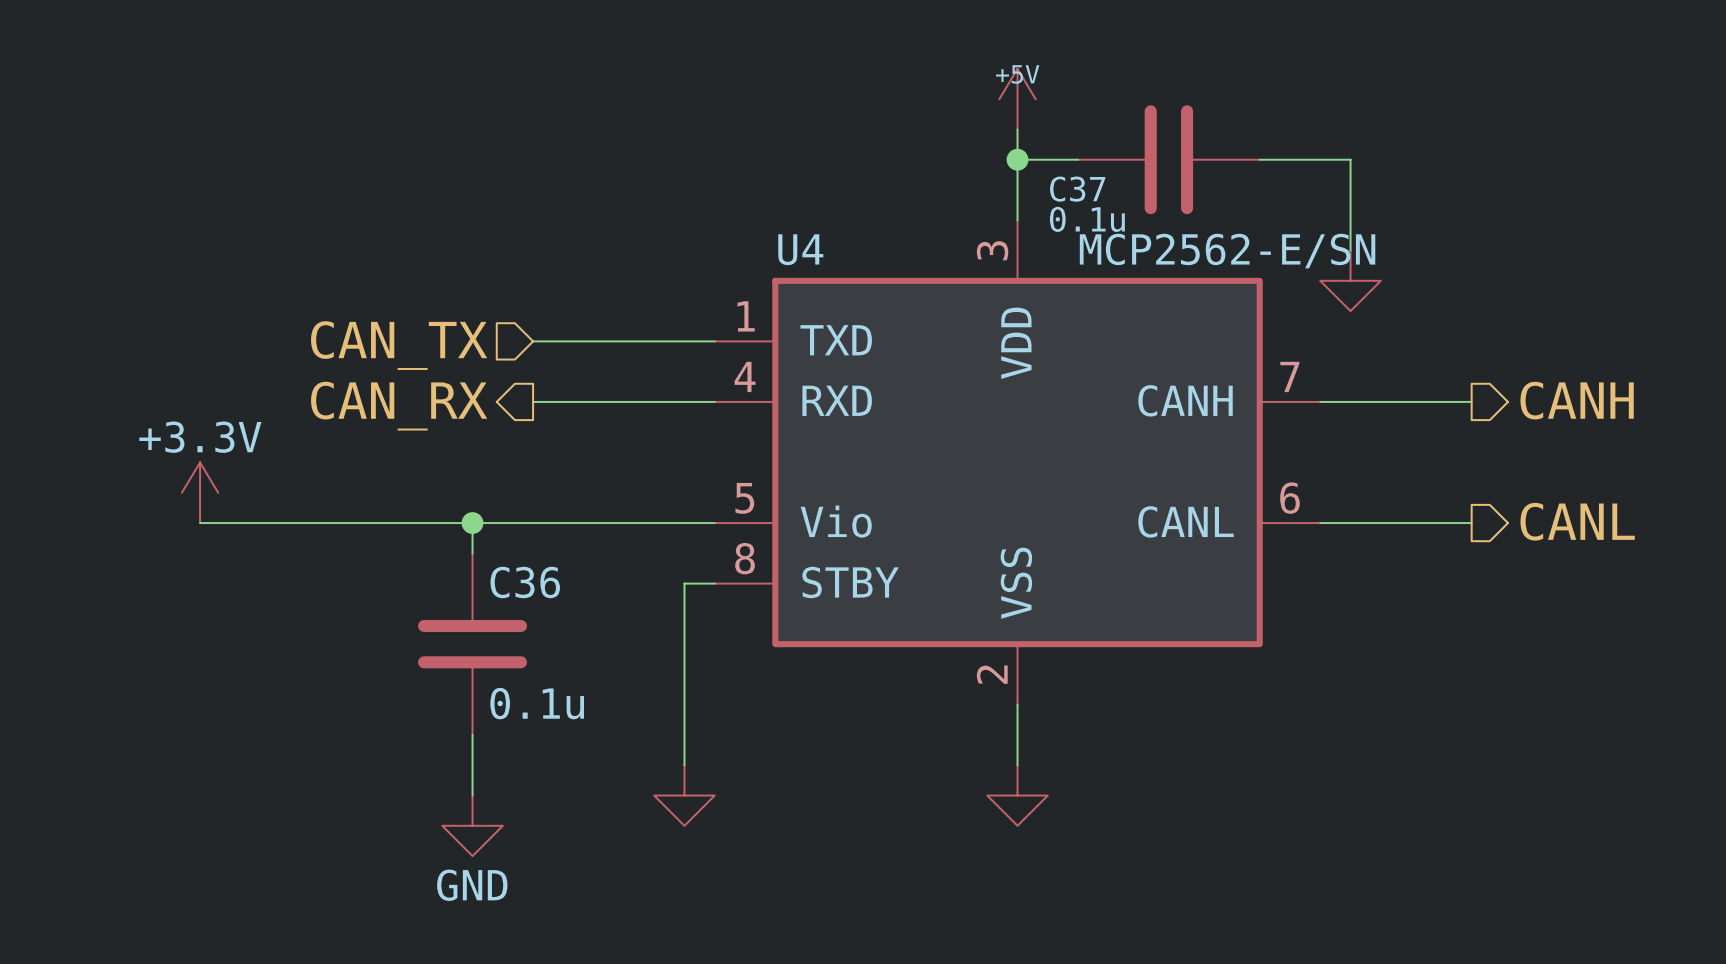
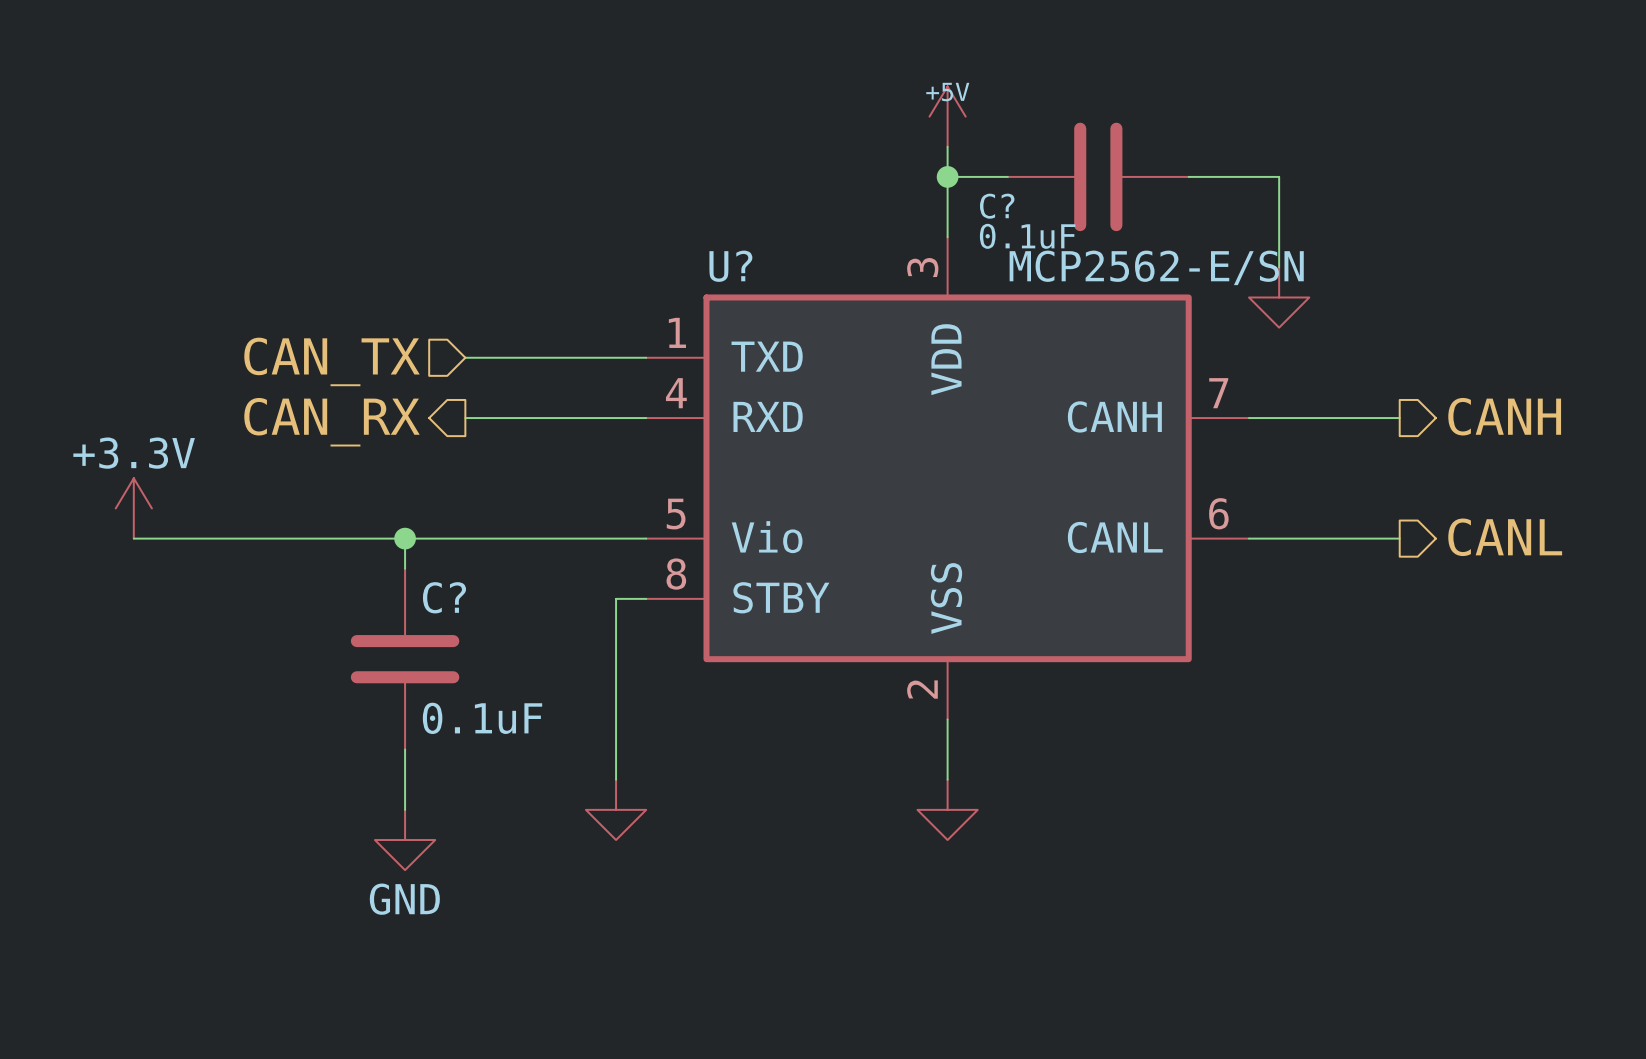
C37 name: C37 (1077, 189) -> C? (997, 206)
C37 value: 0.1u (1087, 219) -> 0.1uF (1027, 236)
U4 name: U4 (800, 249) -> U? (730, 266)
C36 name: C36 (525, 582) -> C? (444, 597)
C36 value: 0.1u (537, 703) -> 0.1uF (482, 718)

